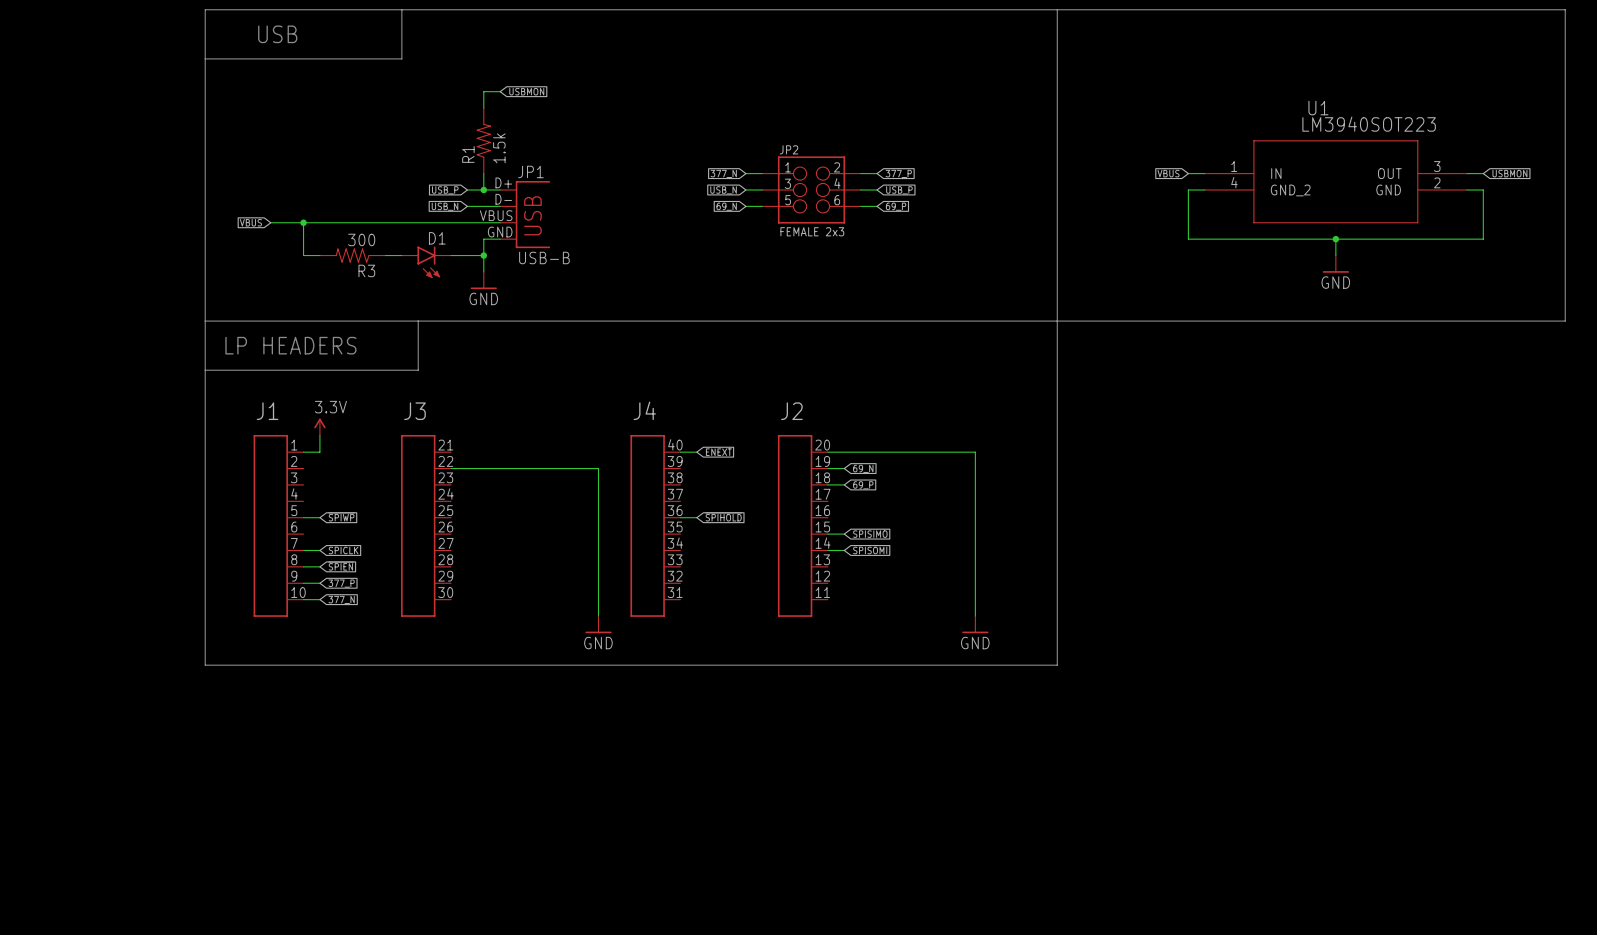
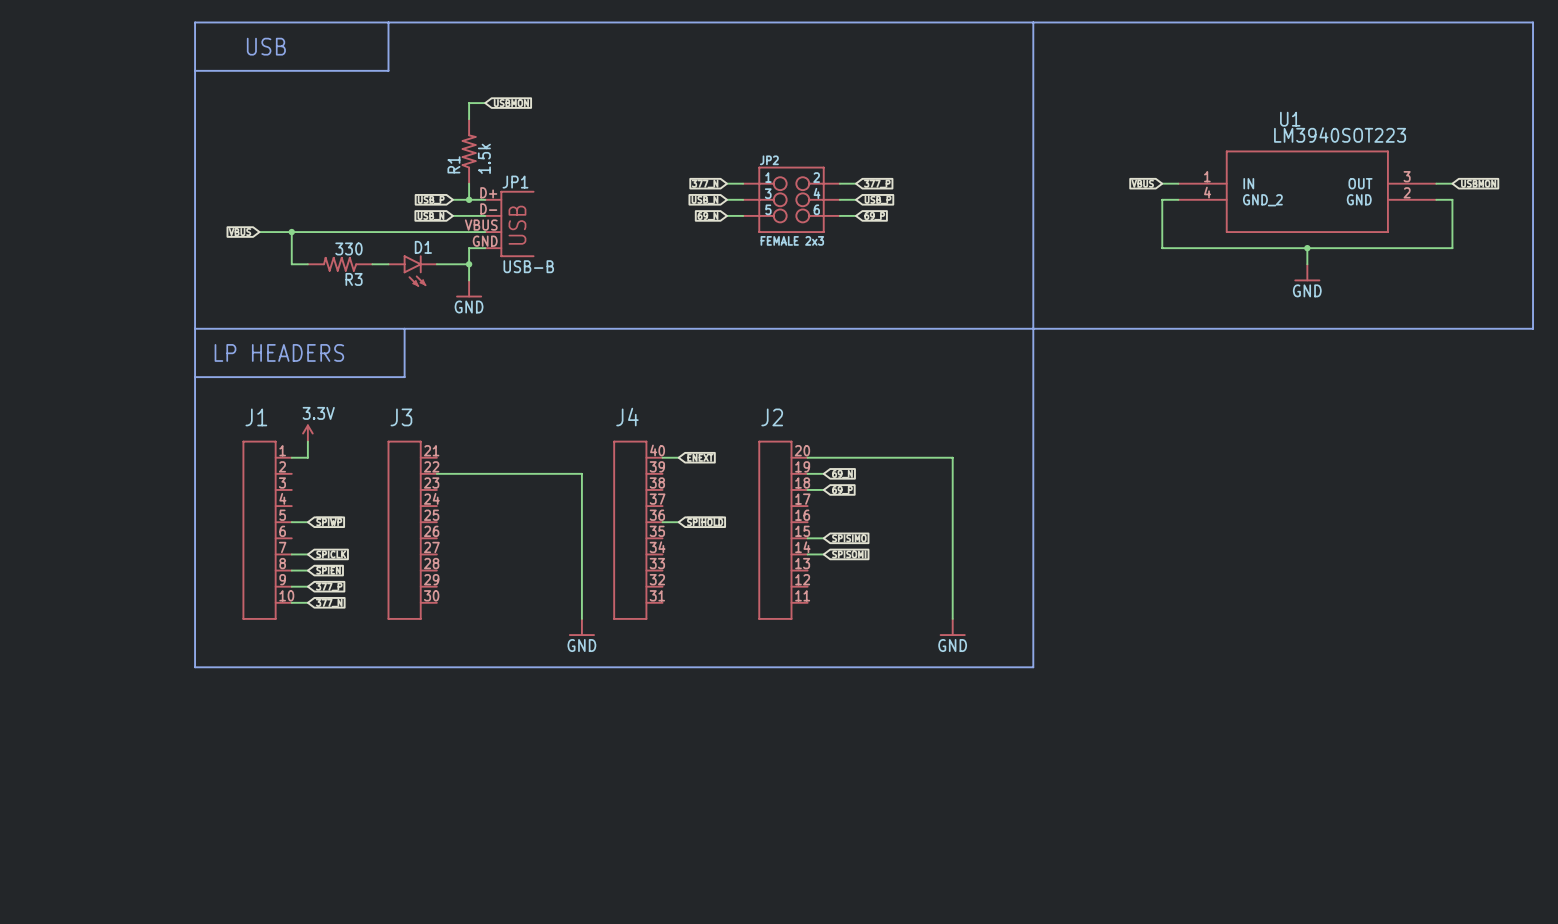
R3 value: 300 (361, 239) -> 330 (348, 248)

